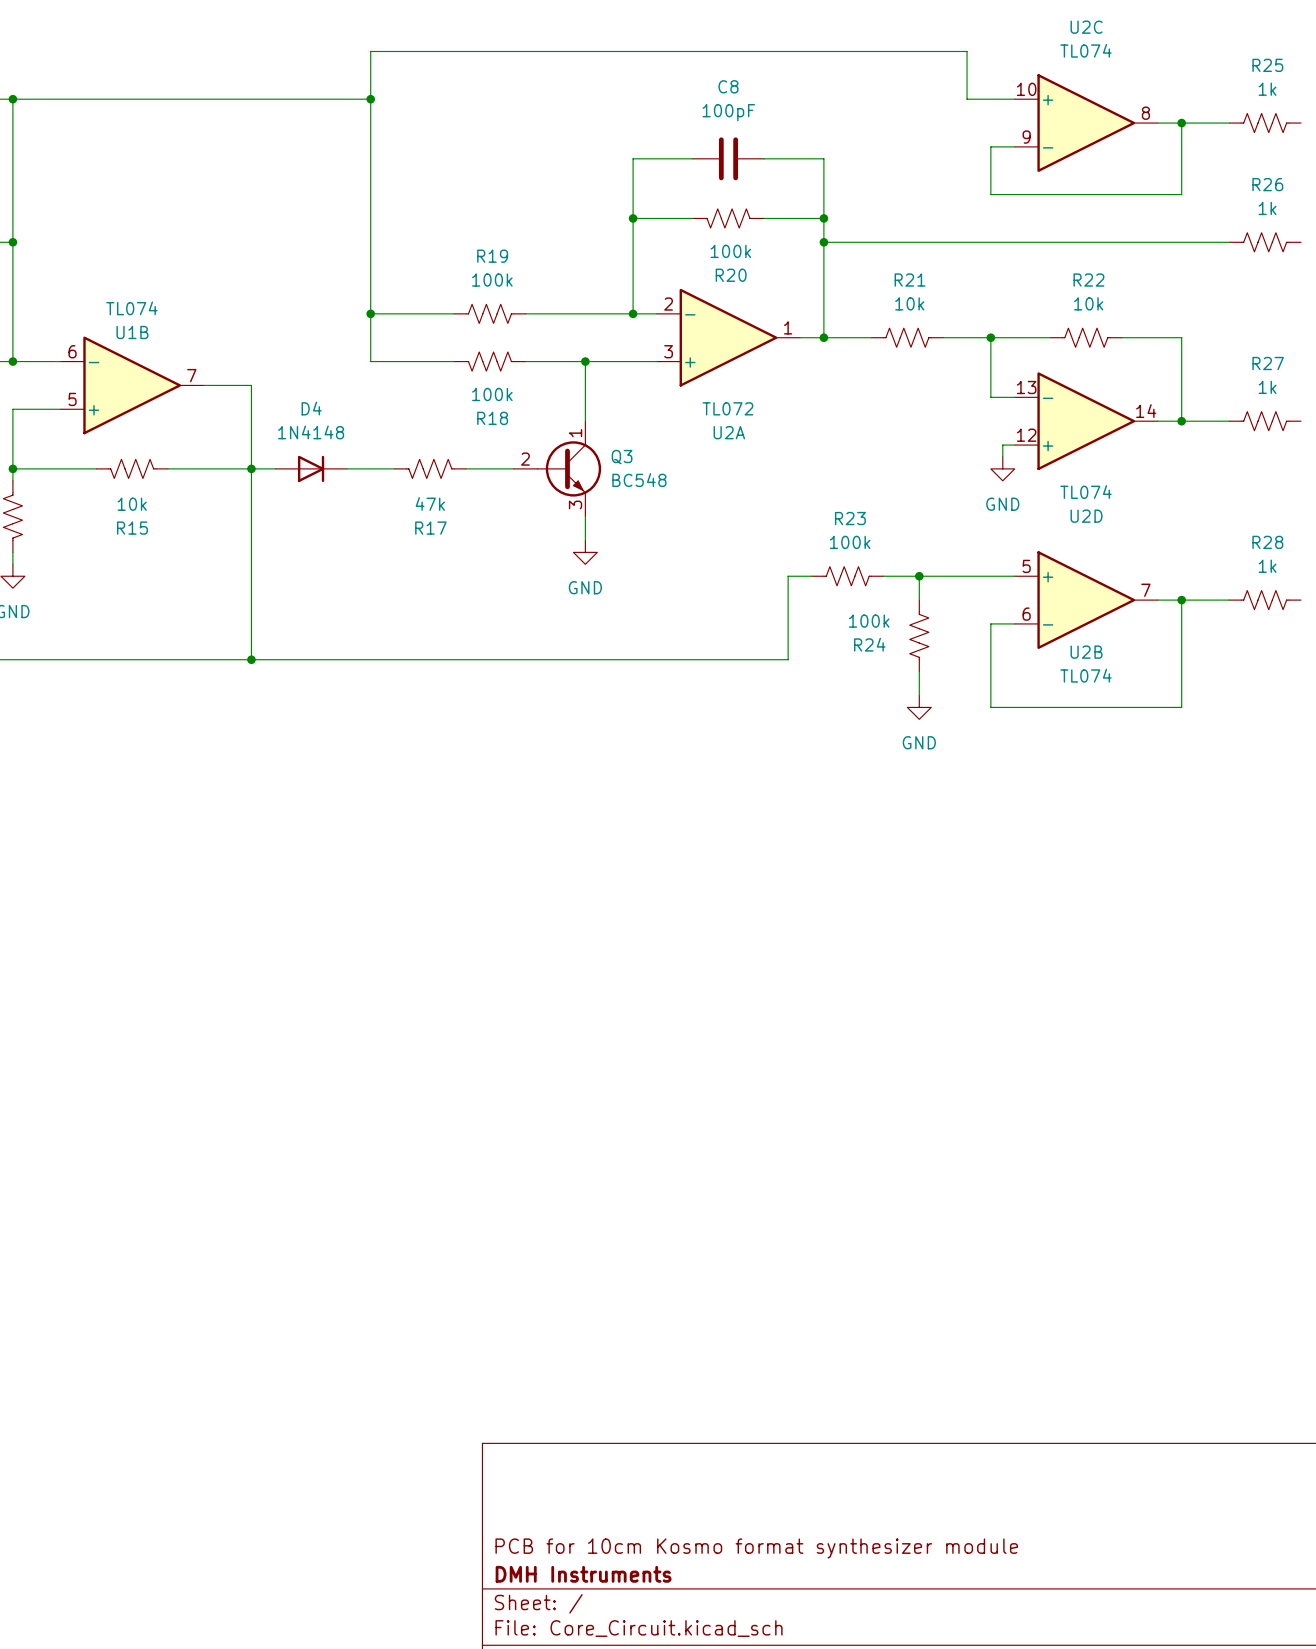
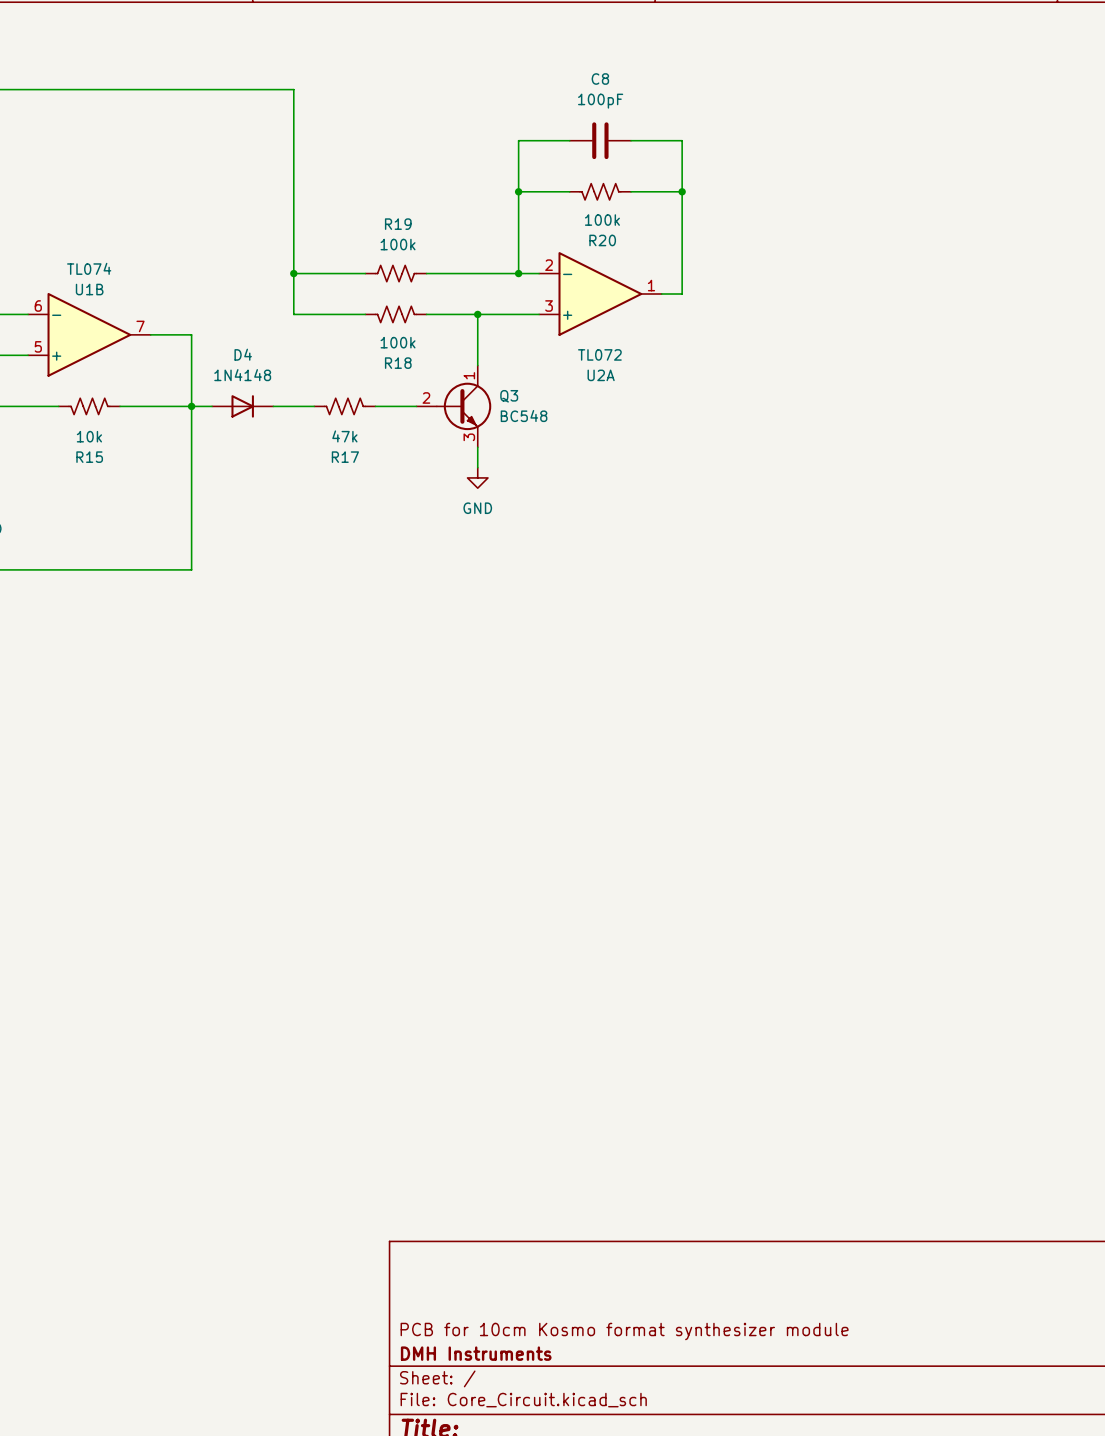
wire: (370, 99) (370, 51) (967, 51) (967, 99) (1014, 99) -> none
junction: (370, 99) -> none
U2C: TL074 (1086, 123) -> none
wire: (1157, 123) (1229, 123) -> none
wire: (1181, 123) (1181, 194) (990, 194) (990, 146) (1014, 146) -> none
junction: (1181, 123) -> none
R25: 1k (1265, 123) -> none
wire: (823, 242) (1229, 242) -> none
junction: (823, 242) -> none
R26: 1k (1265, 242) -> none
wire: (823, 337) (871, 337) -> none
junction: (823, 337) -> none
R21: 10k (907, 337) -> none
wire: (943, 337) (1050, 337) -> none
wire: (990, 337) (990, 397) (1014, 397) -> none
junction: (990, 337) -> none
R22: 10k (1086, 337) -> none
wire: (1122, 337) (1181, 337) (1181, 421) -> none
U2D: TL074 (1086, 421) -> none
wire: (1157, 421) (1229, 421) -> none
junction: (1181, 421) -> none
R27: 1k (1265, 421) -> none
wire: (1014, 445) (1002, 445) (1002, 456) -> none
power symbol: GND (1002, 468) -> none
wire: (811, 576) (788, 576) (788, 659) (251, 659) -> none
R23: 100k (847, 576) -> none
wire: (883, 576) (1014, 576) -> none
wire: (919, 576) (919, 600) -> none
junction: (919, 576) -> none
U2B: TL074 (1086, 600) -> none
wire: (1157, 600) (1229, 600) -> none
wire: (1181, 600) (1181, 707) (990, 707) (990, 623) (1014, 623) -> none
junction: (1181, 600) -> none
R28: 1k (1265, 600) -> none
R24: 100k (919, 635) -> none
junction: (251, 659) -> none
wire: (919, 671) (919, 695) -> none
power symbol: GND (919, 707) -> none

